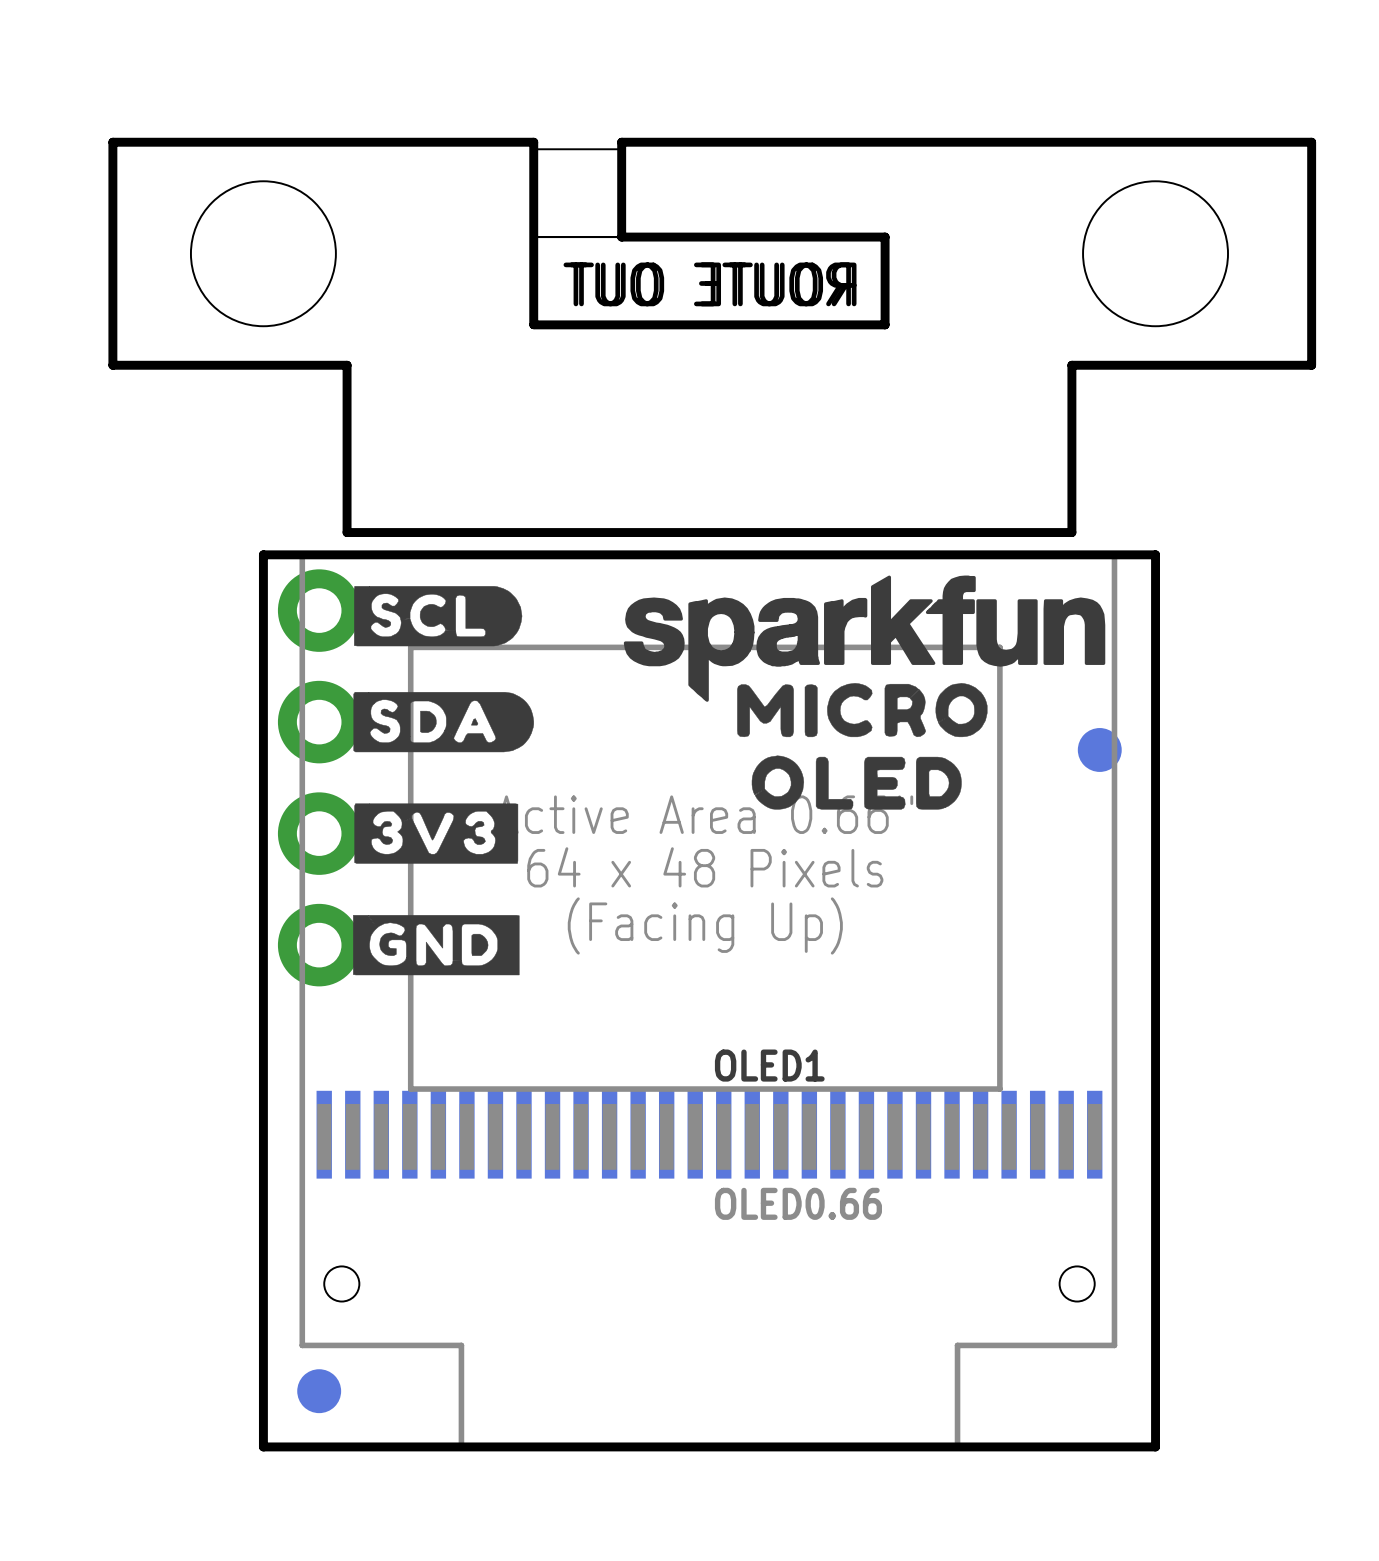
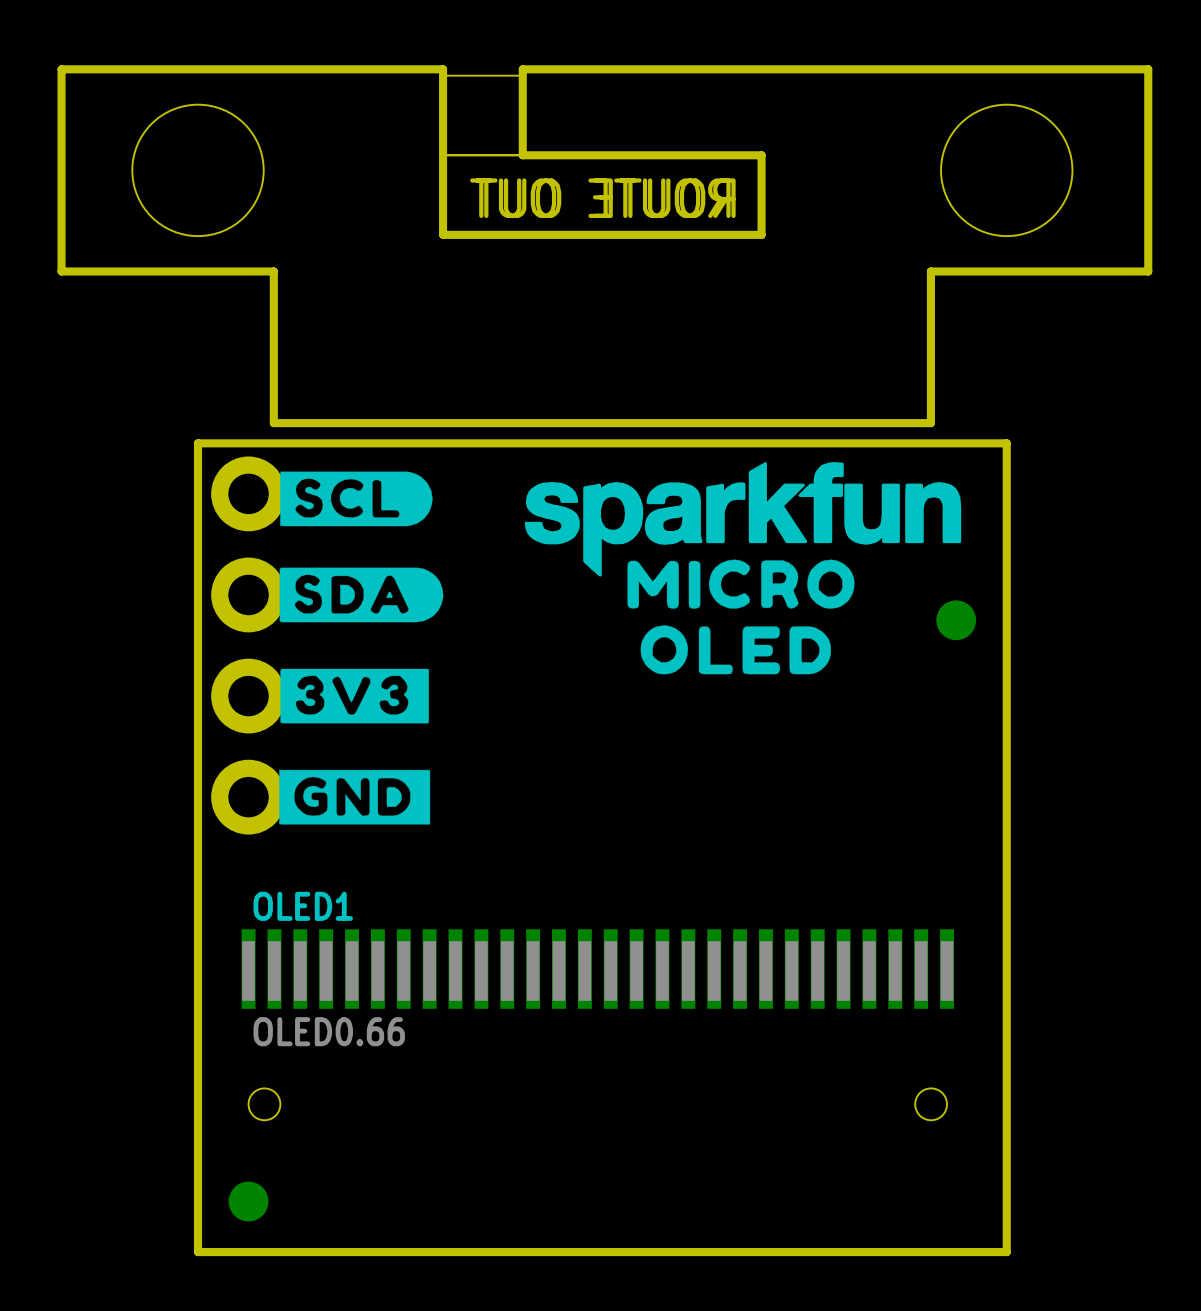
OLED1 footprint: [299, 552, 1118, 1450] -> [241, 929, 955, 1121]
OLED1 name position: OLED1 (769, 1065) -> OLED1 (303, 906)
OLED1 value position: OLED0.66 (798, 1203) -> OLED0.66 (329, 1031)

